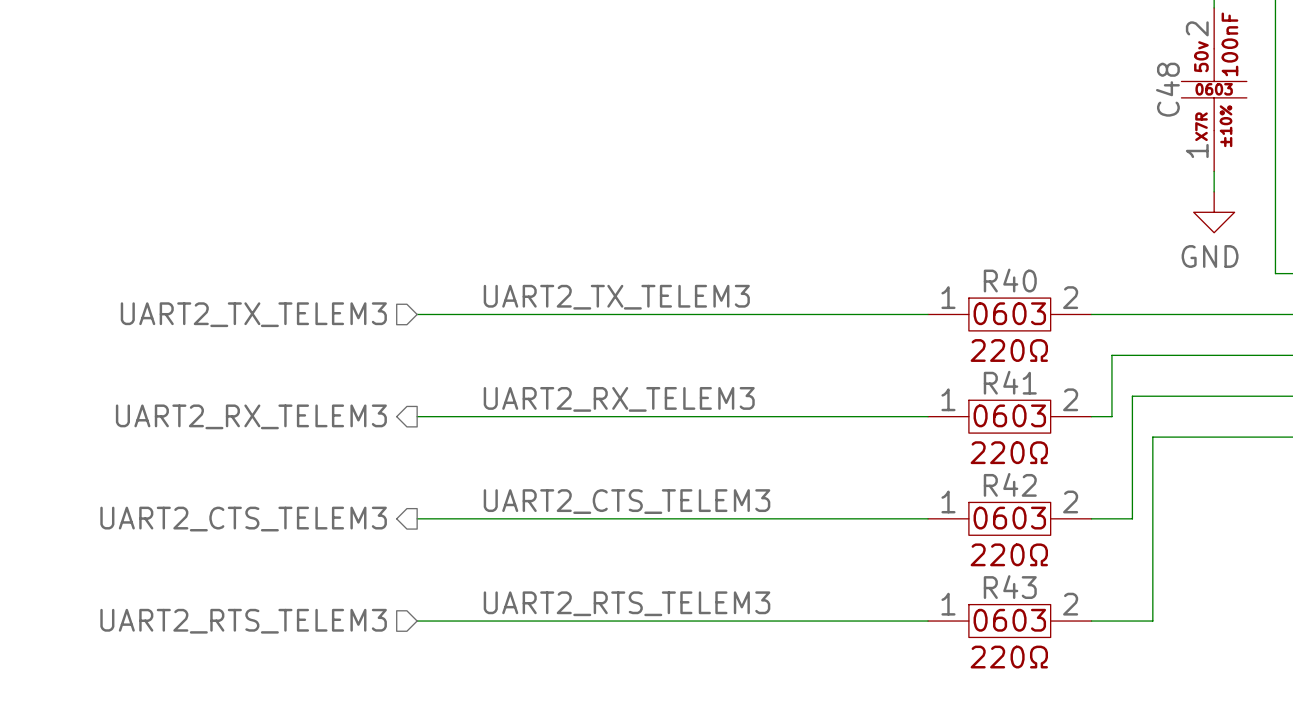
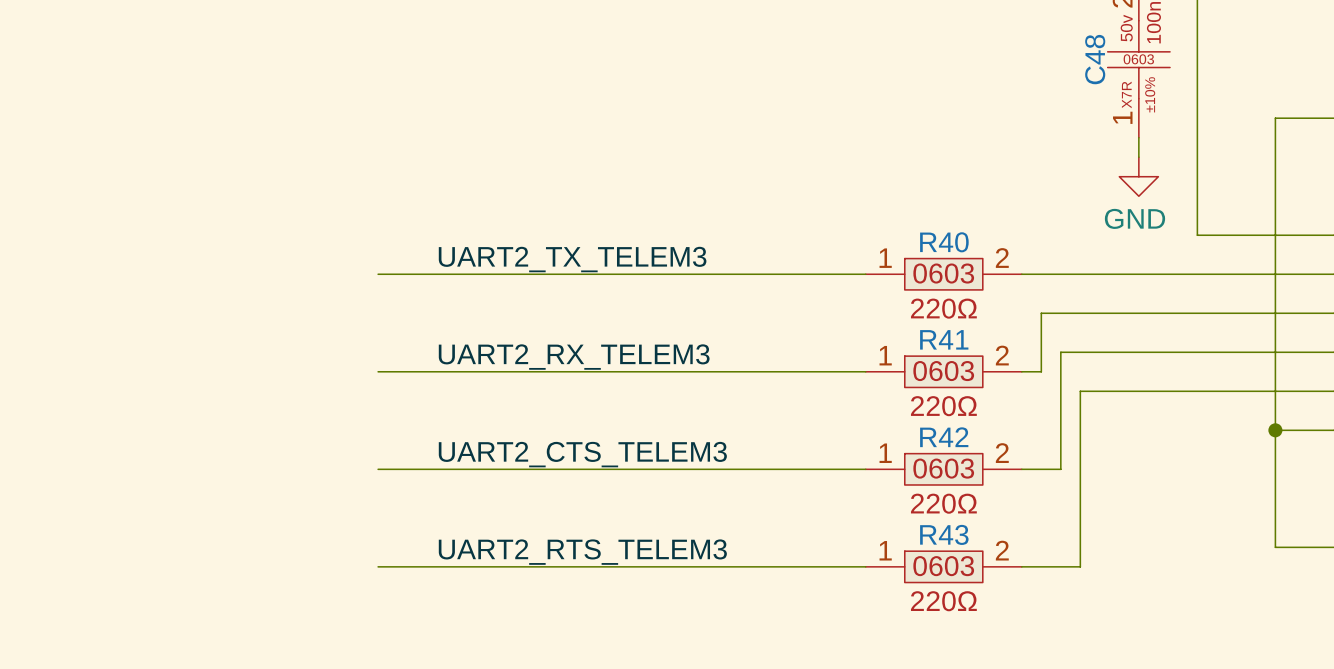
hierarchical label: UART2_TX_TELEM3 (253, 314) -> none
hierarchical label: UART2_RX_TELEM3 (251, 416) -> none
hierarchical label: UART2_CTS_TELEM3 (243, 519) -> none
hierarchical label: UART2_RTS_TELEM3 (243, 621) -> none

